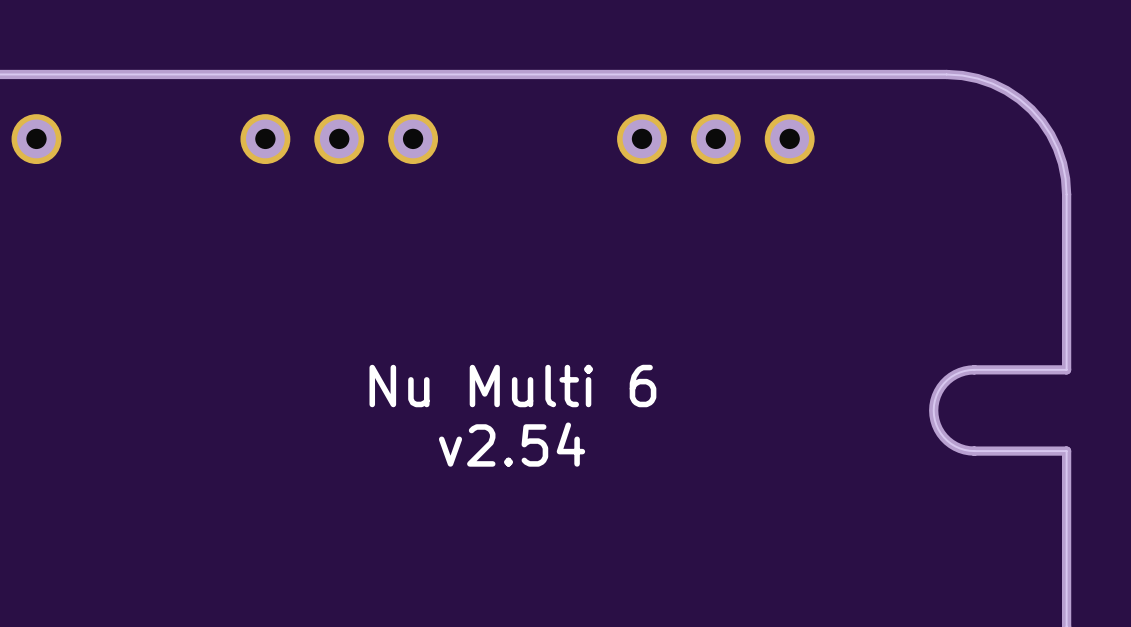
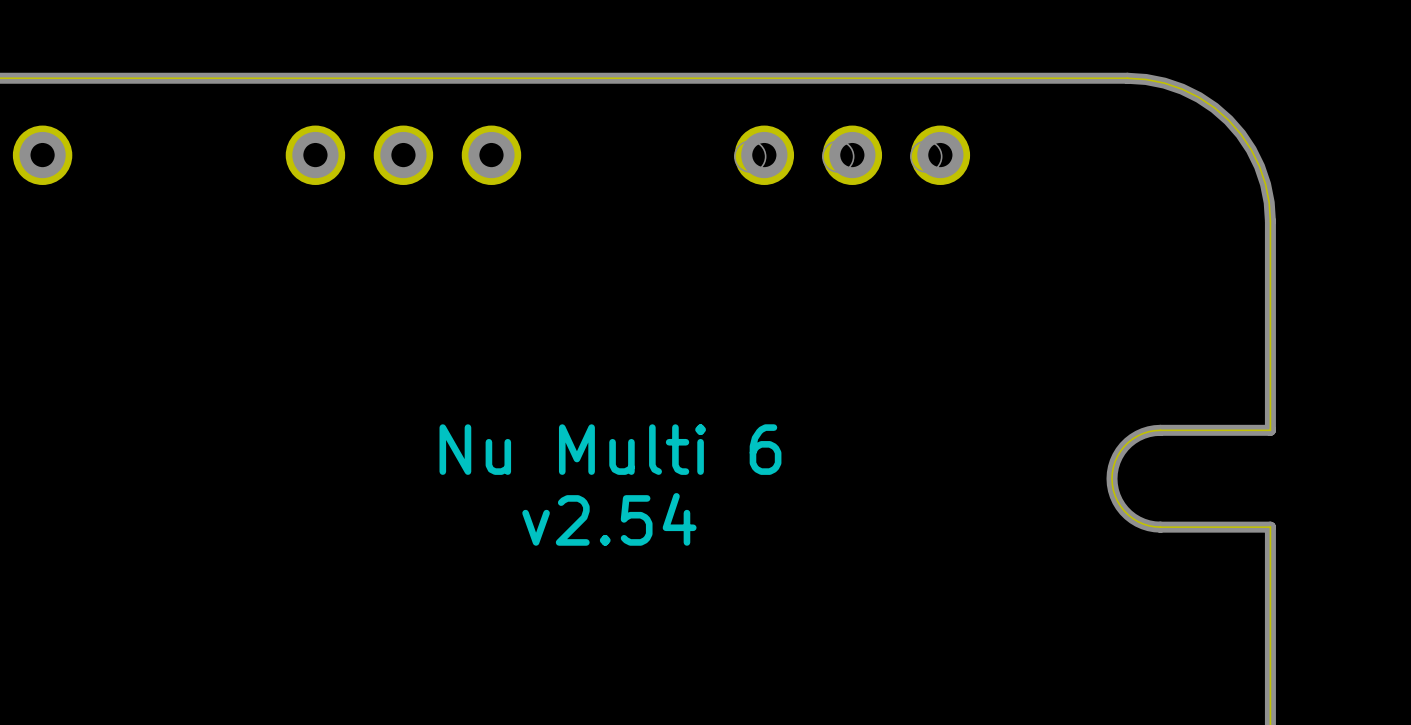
drawing: none -> [734, 140, 766, 173]
drawing: none -> [822, 140, 854, 173]
drawing: none -> [910, 140, 942, 173]

